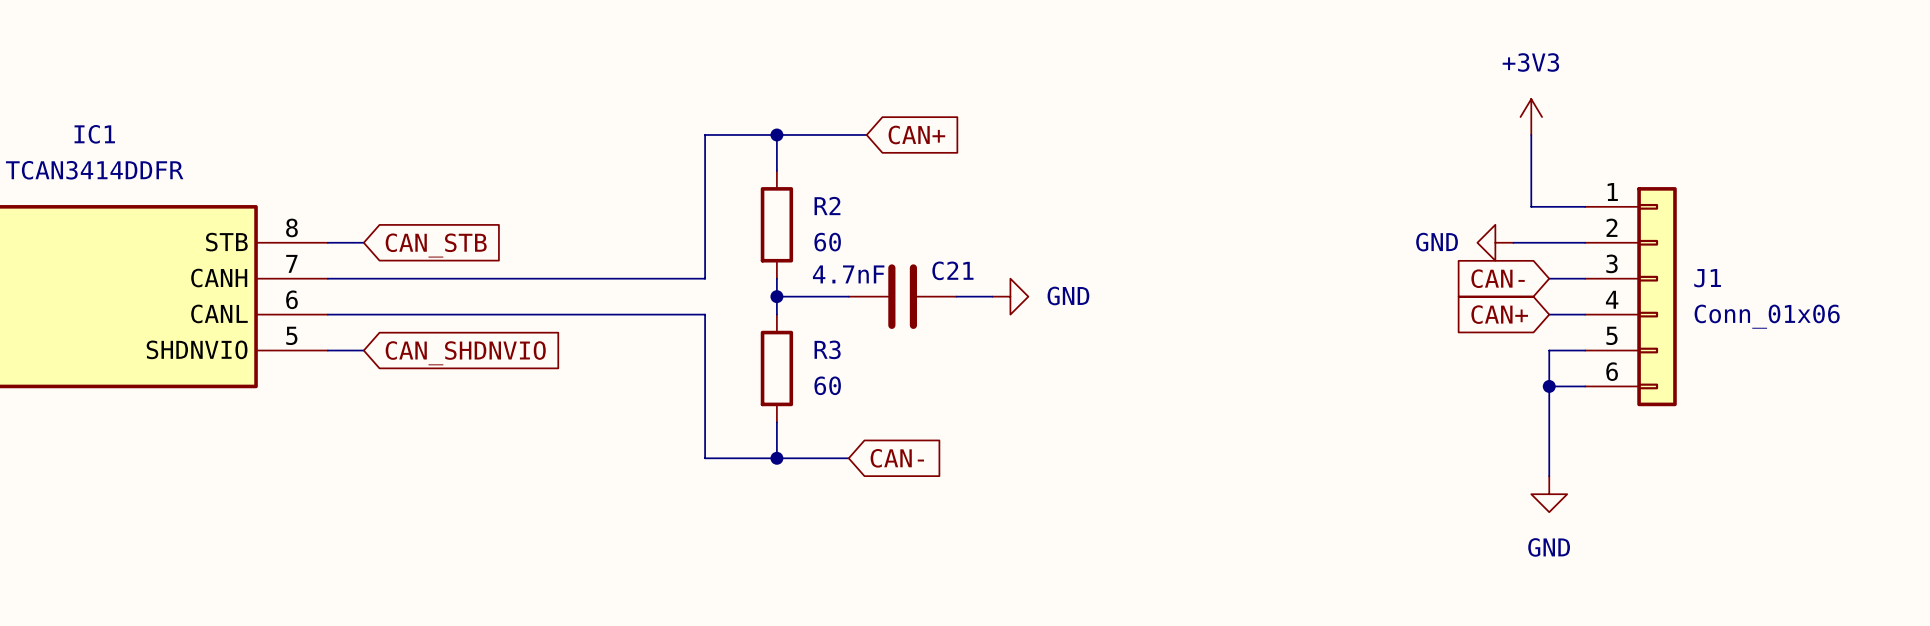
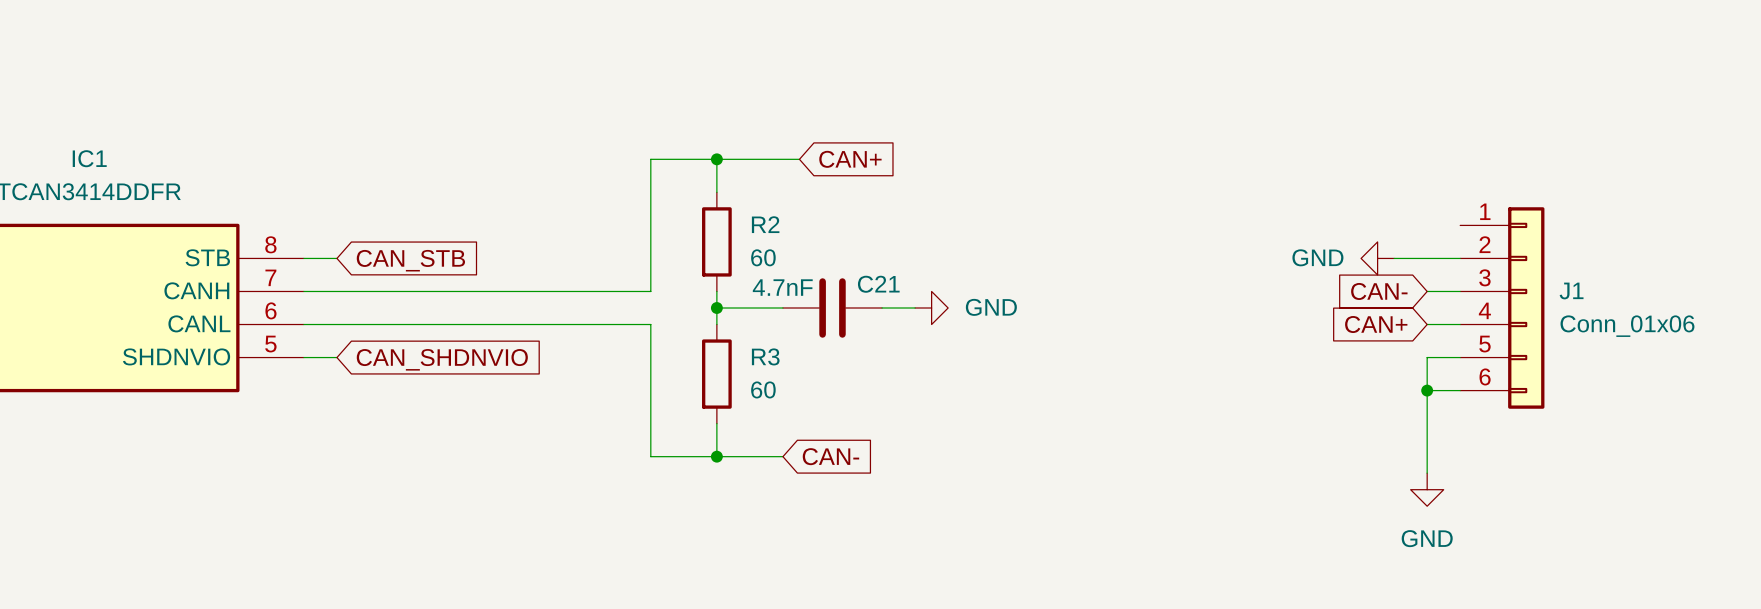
power symbol: +3V3 (1531, 117) -> none
wire: (1531, 134) (1531, 206) (1585, 206) -> none

